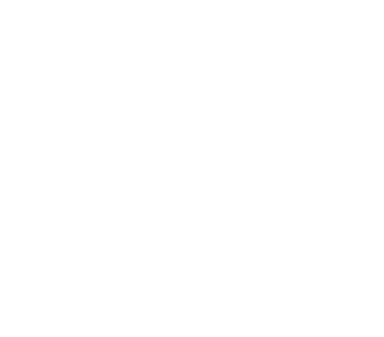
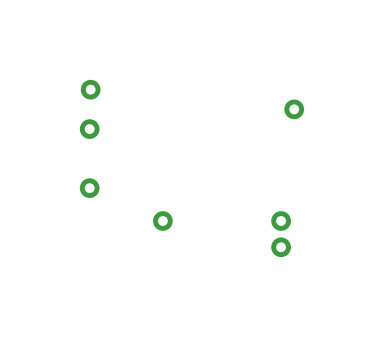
via: none -> (90, 89)
via: none -> (294, 109)
via: none -> (89, 129)
via: none -> (89, 188)
via: none -> (162, 221)
via: none -> (281, 221)
via: none -> (281, 247)

